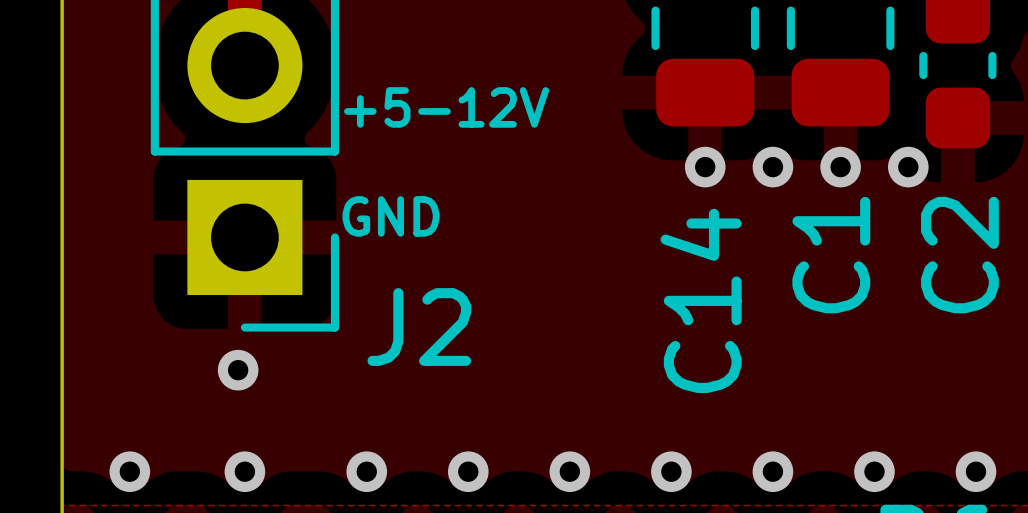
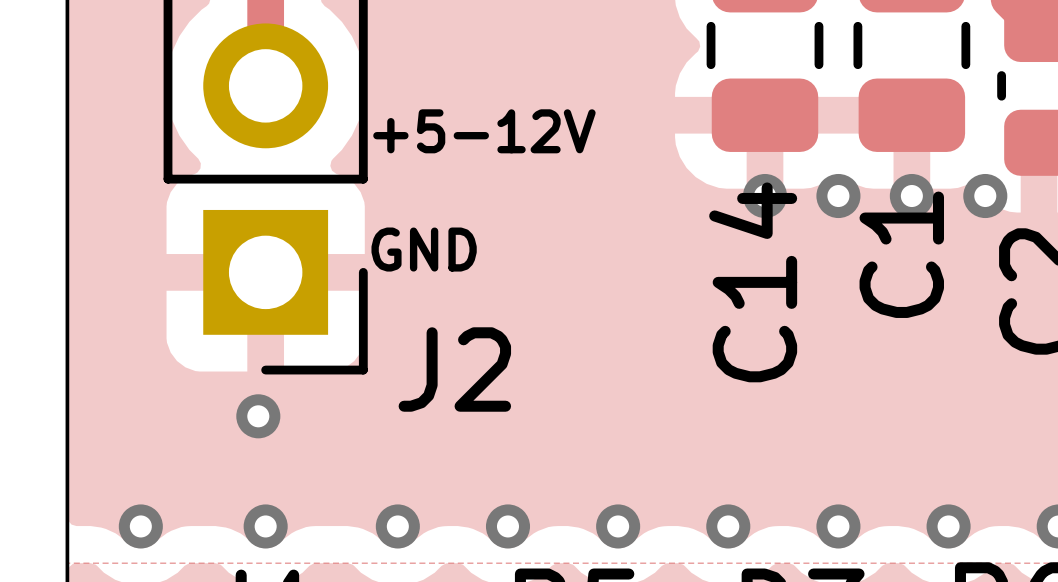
C1 name position: C1 (831, 255) -> C1 (901, 254)
C14 name position: C14 (701, 300) -> C14 (753, 282)

